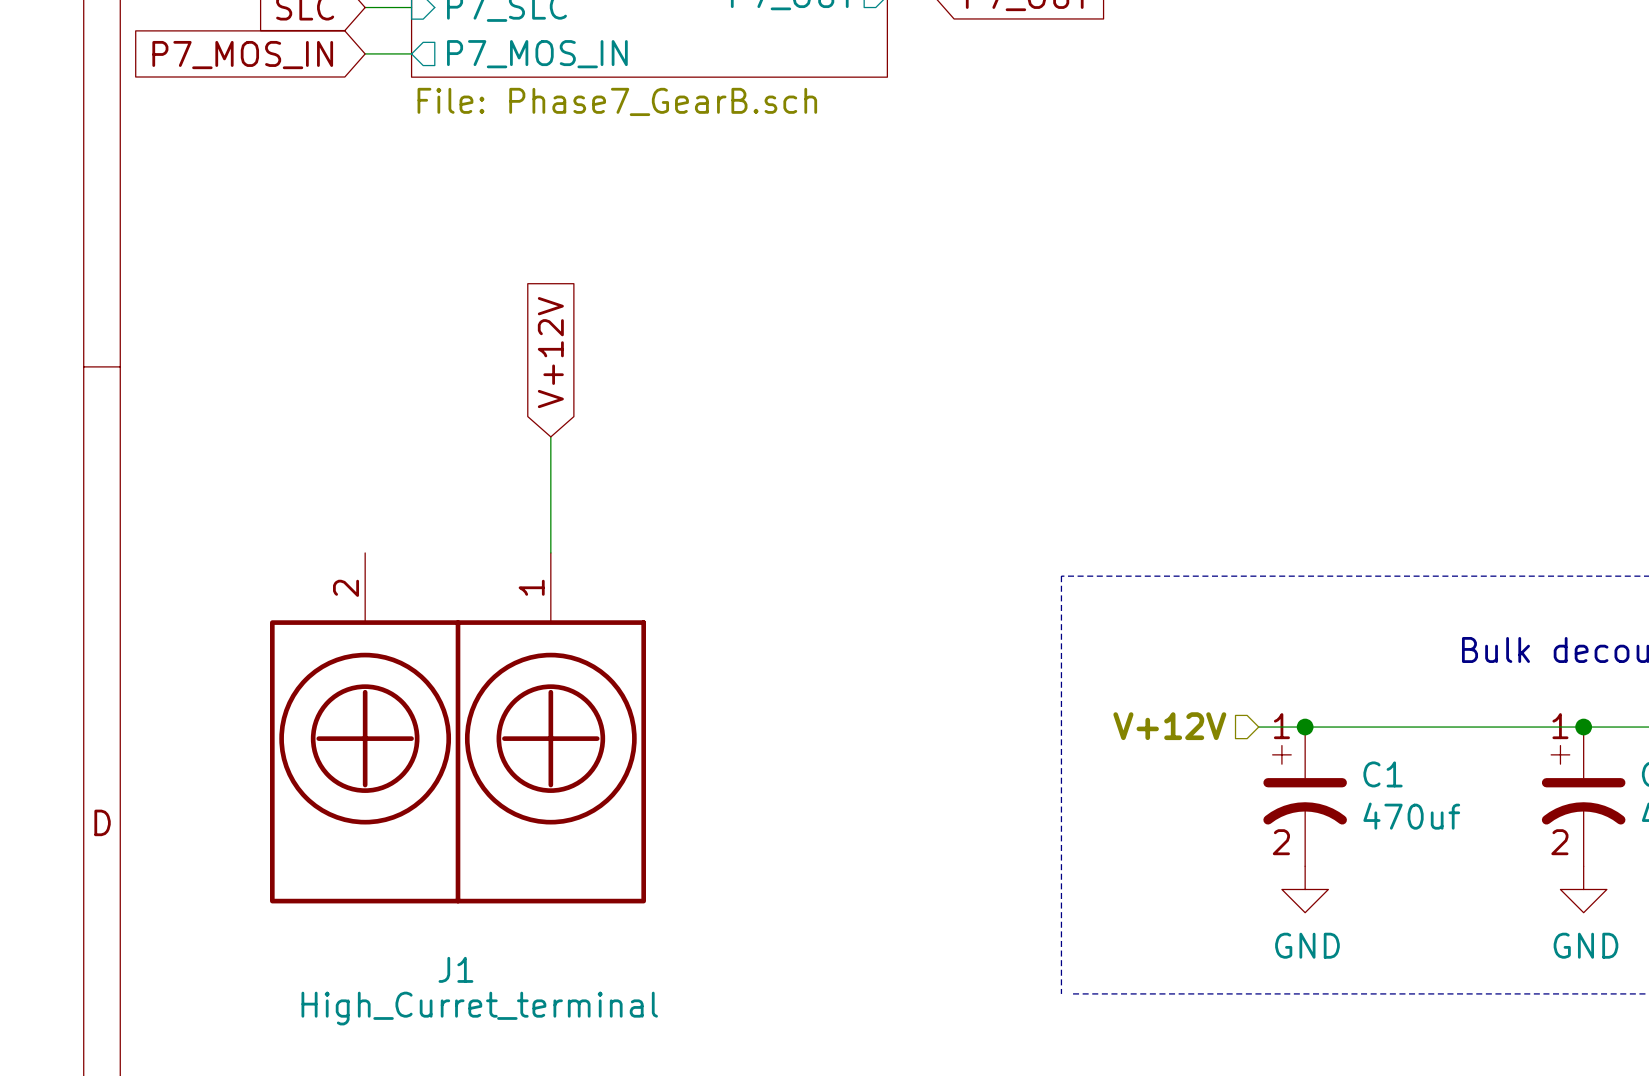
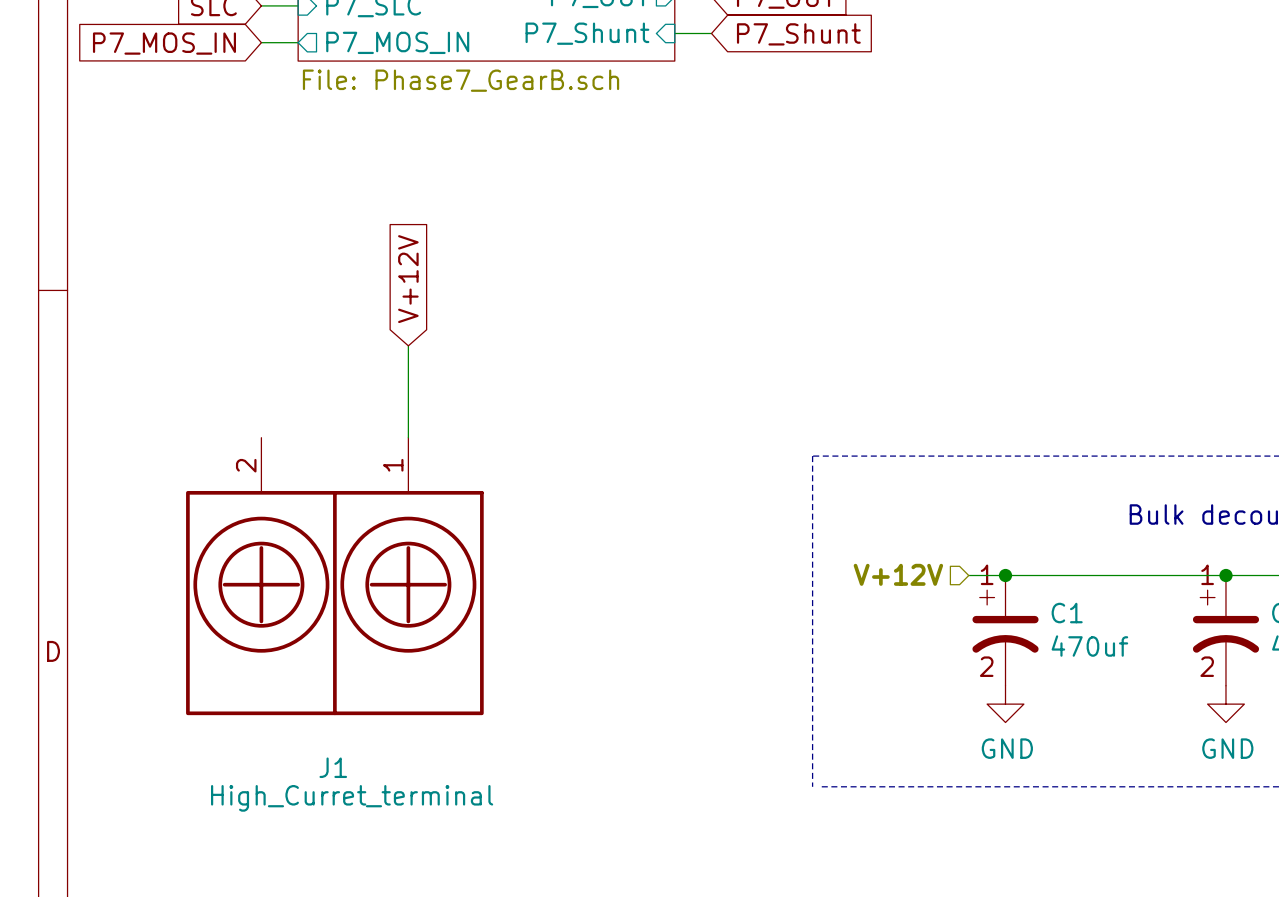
sheet pin: none -> P7_Shunt (587, 33)
wire: none -> (674, 33) (711, 33)
global label: none -> P7_Shunt (798, 34)

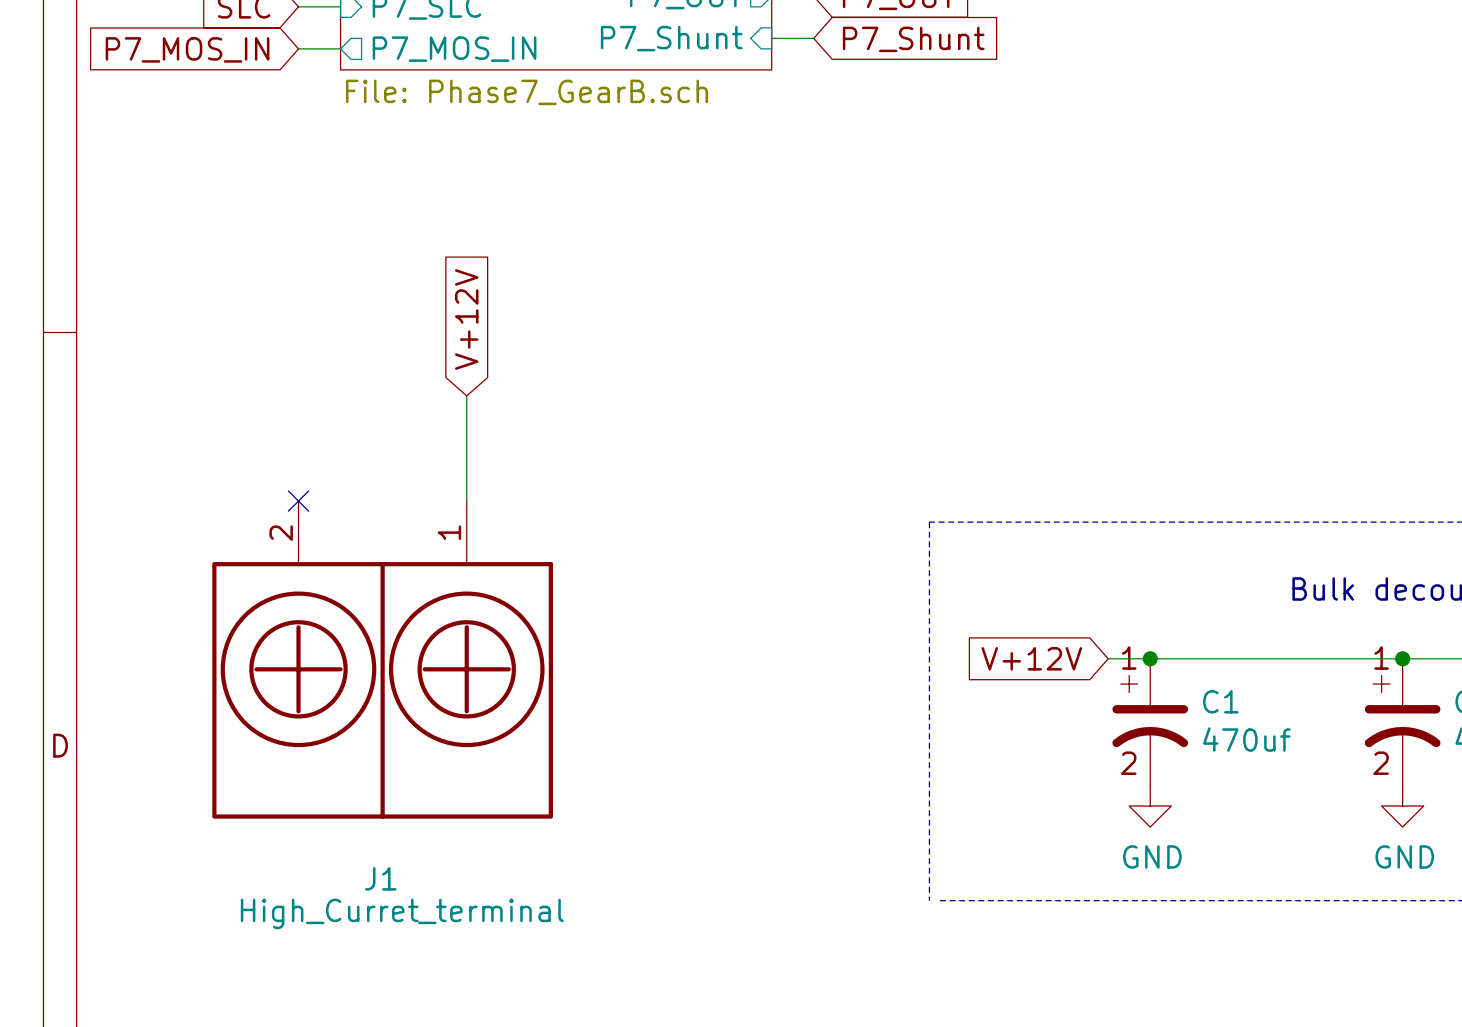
no-connect mark: none -> (298, 501)
hierarchical label: V+12V (898, 574) -> none
global label: none -> V+12V (1031, 658)

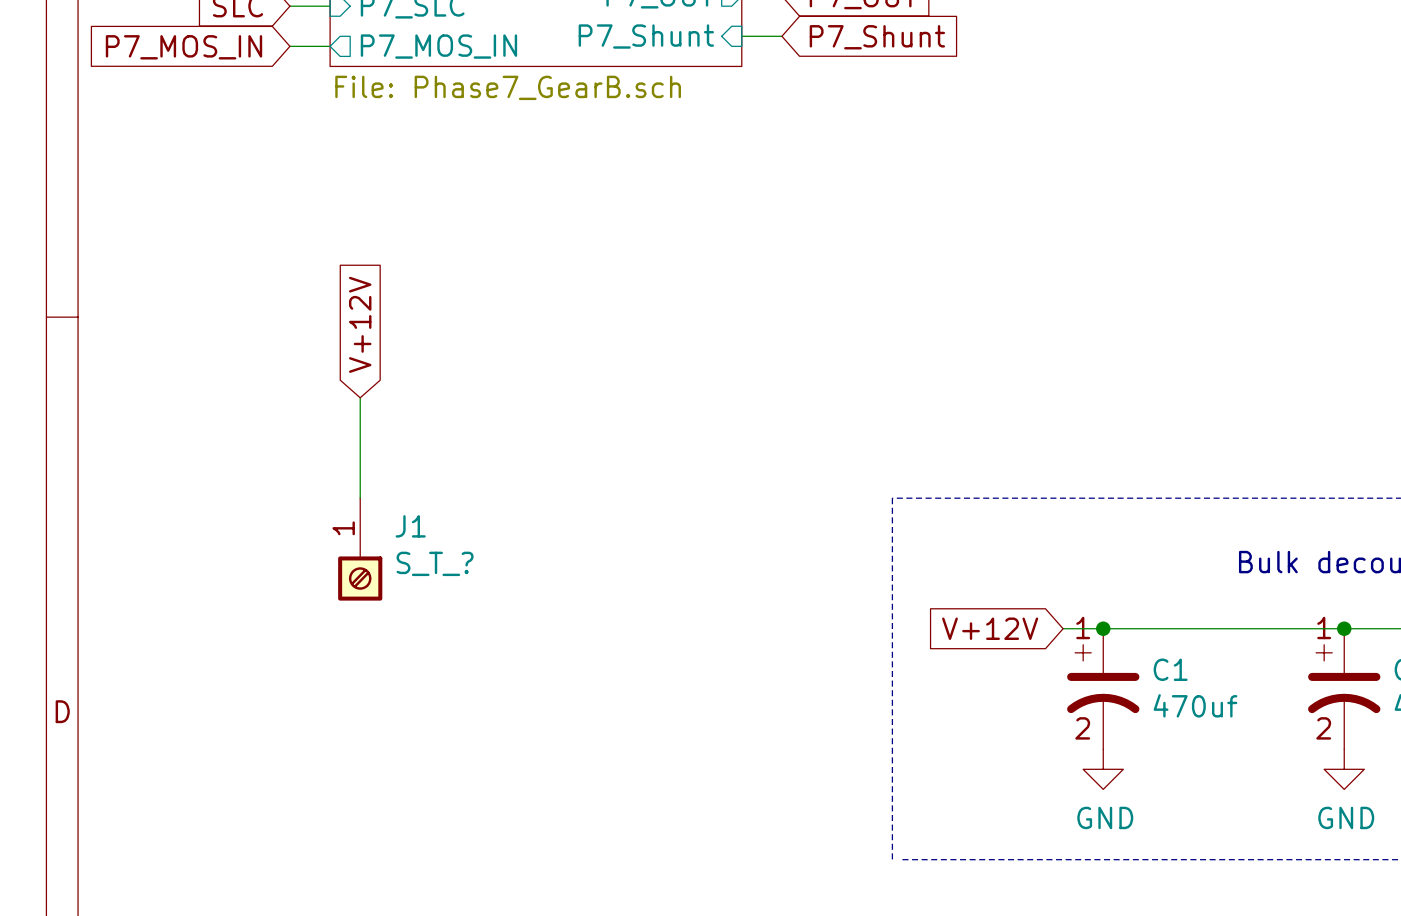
global label position: V+12V (466, 319) -> V+12V (360, 324)
wire: (466, 395) (466, 501) -> (360, 397) (360, 498)
J1 symbol: [212, 501, 553, 819] -> [338, 498, 383, 601]
no-connect mark: (298, 501) -> none
J1 name position: J1 (380, 878) -> J1 (410, 526)
J1 value: High_Curret_terminal (402, 913) -> S_T_? (435, 563)

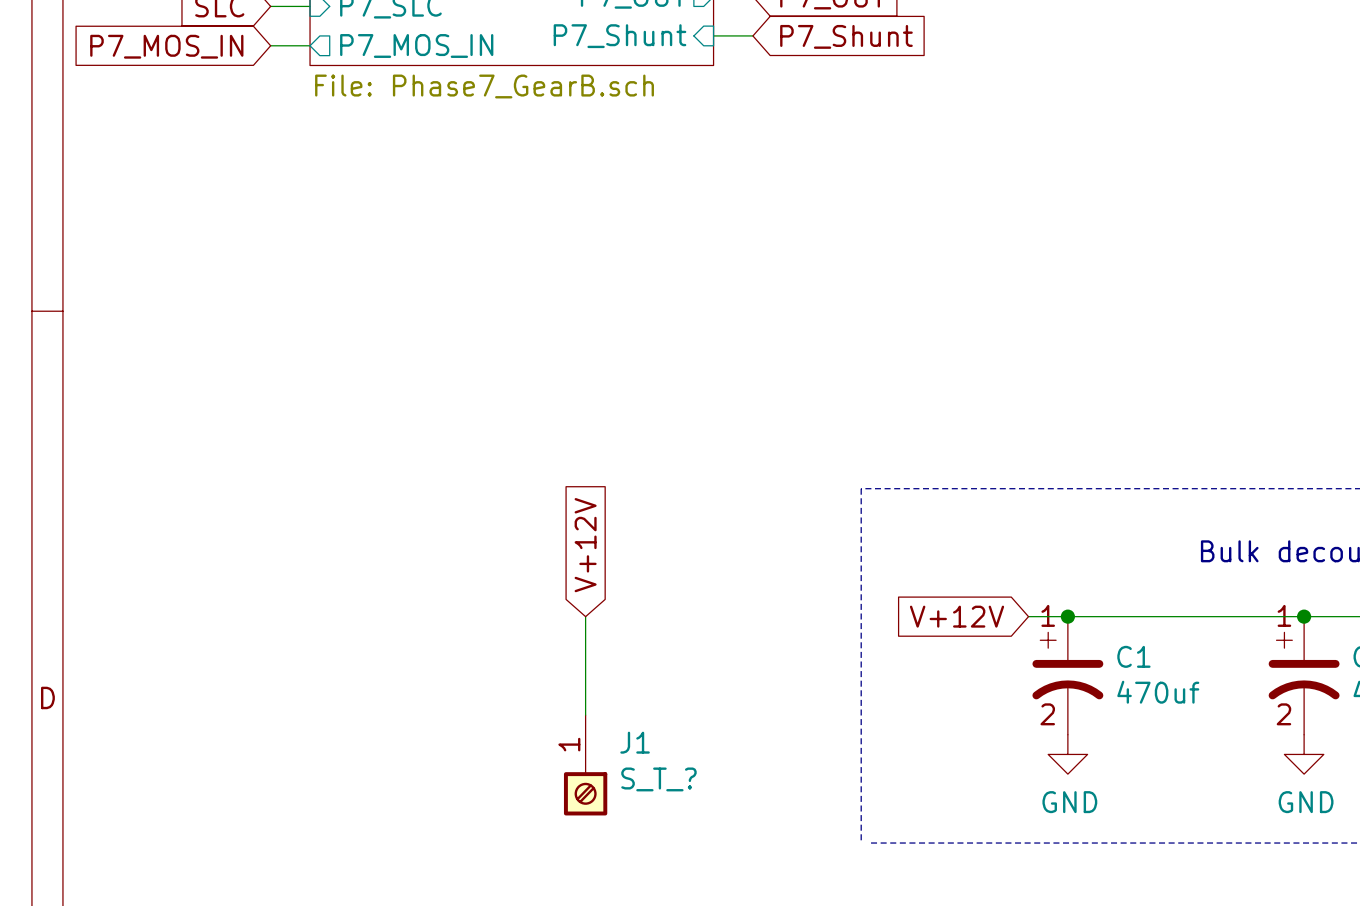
global label position: V+12V (360, 324) -> V+12V (585, 545)
wire: (360, 397) (360, 498) -> (585, 616) (585, 715)
J1 position: (360, 549) -> (585, 765)

